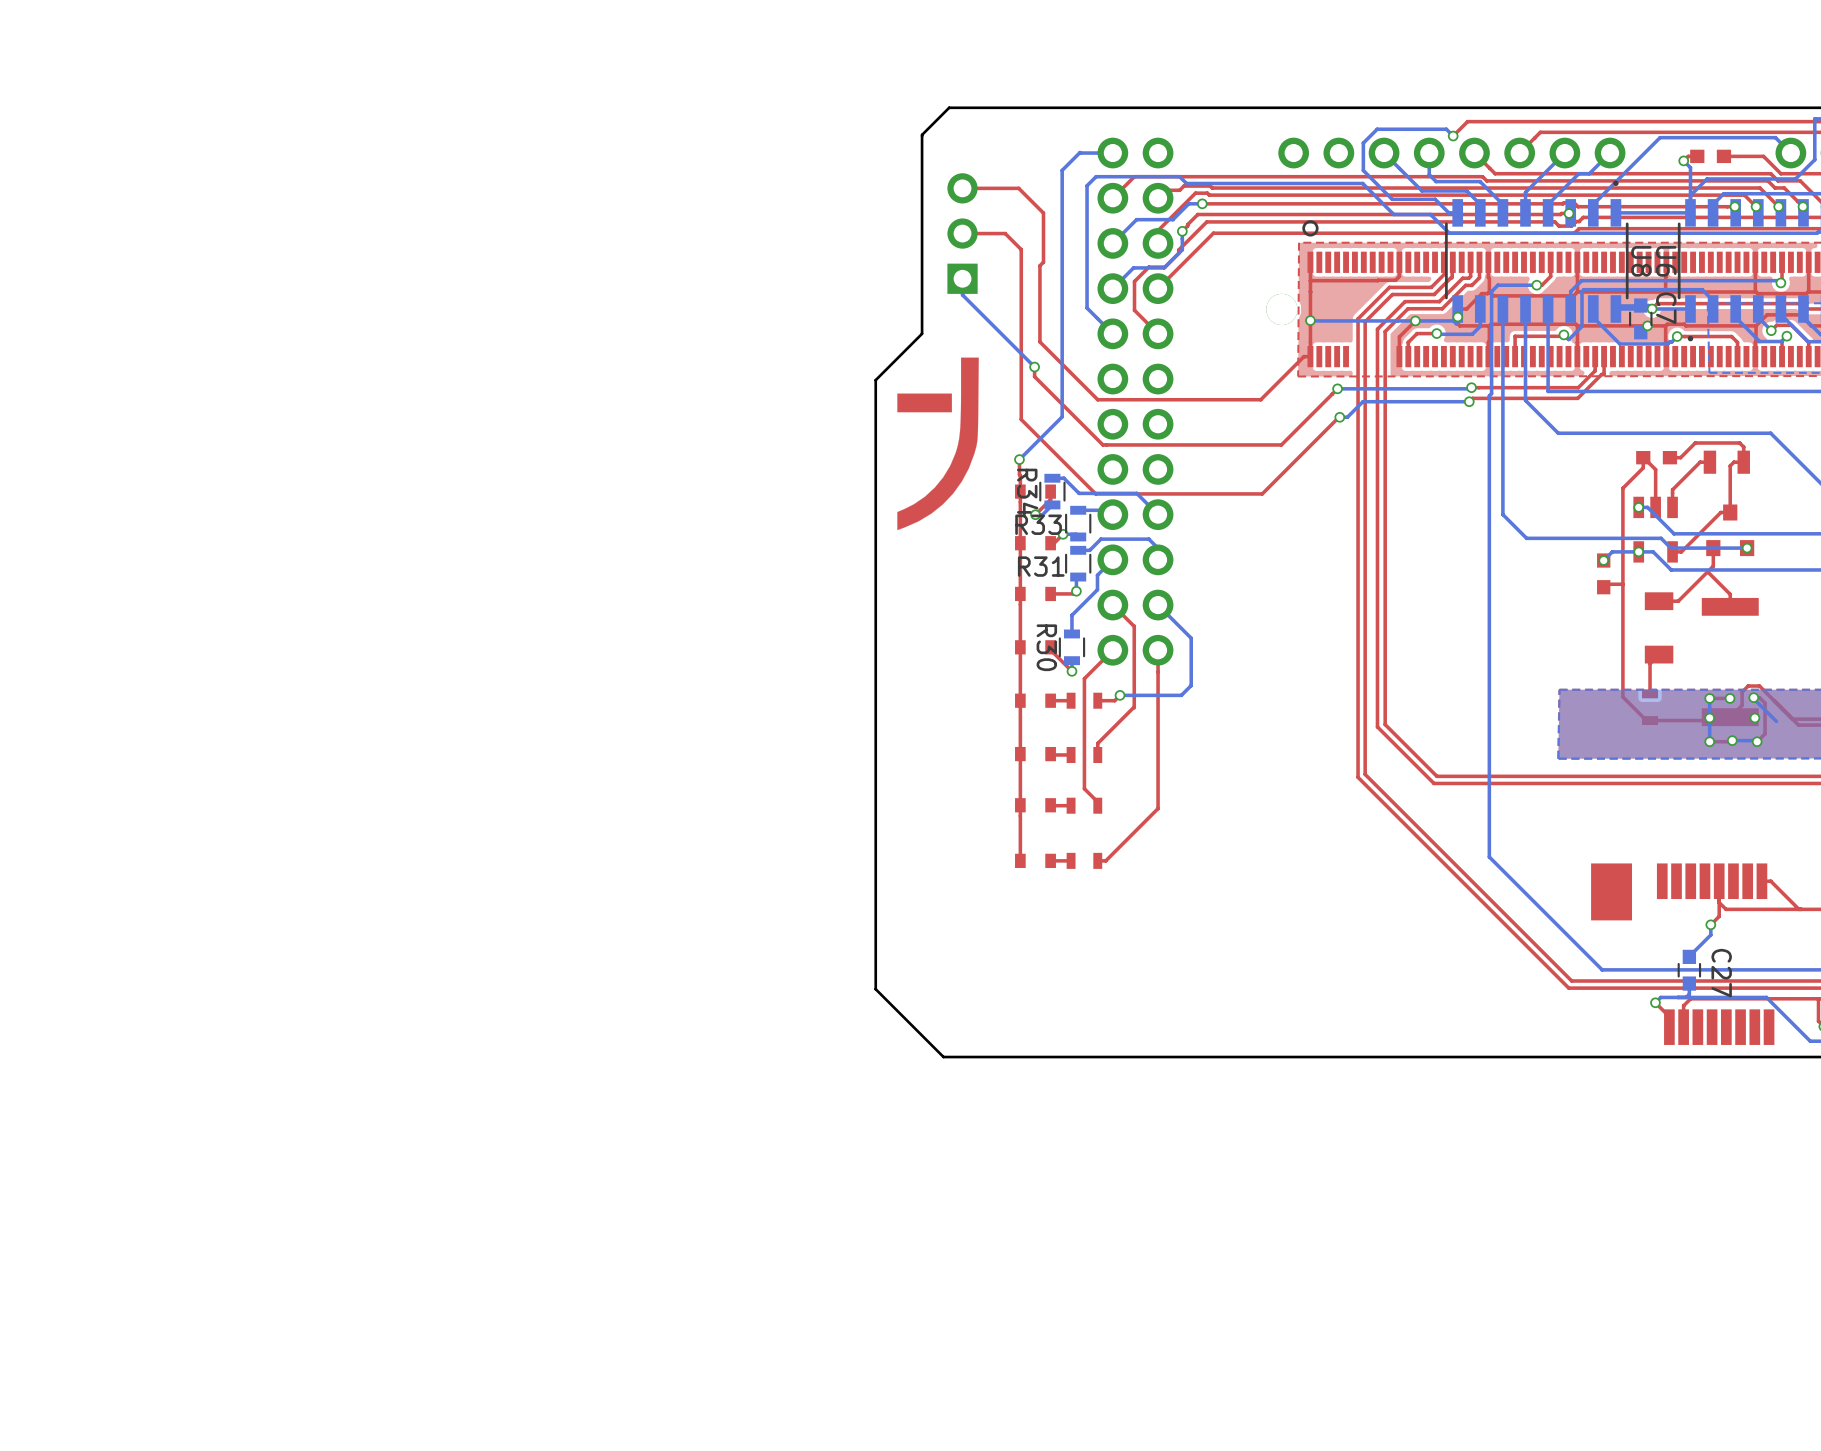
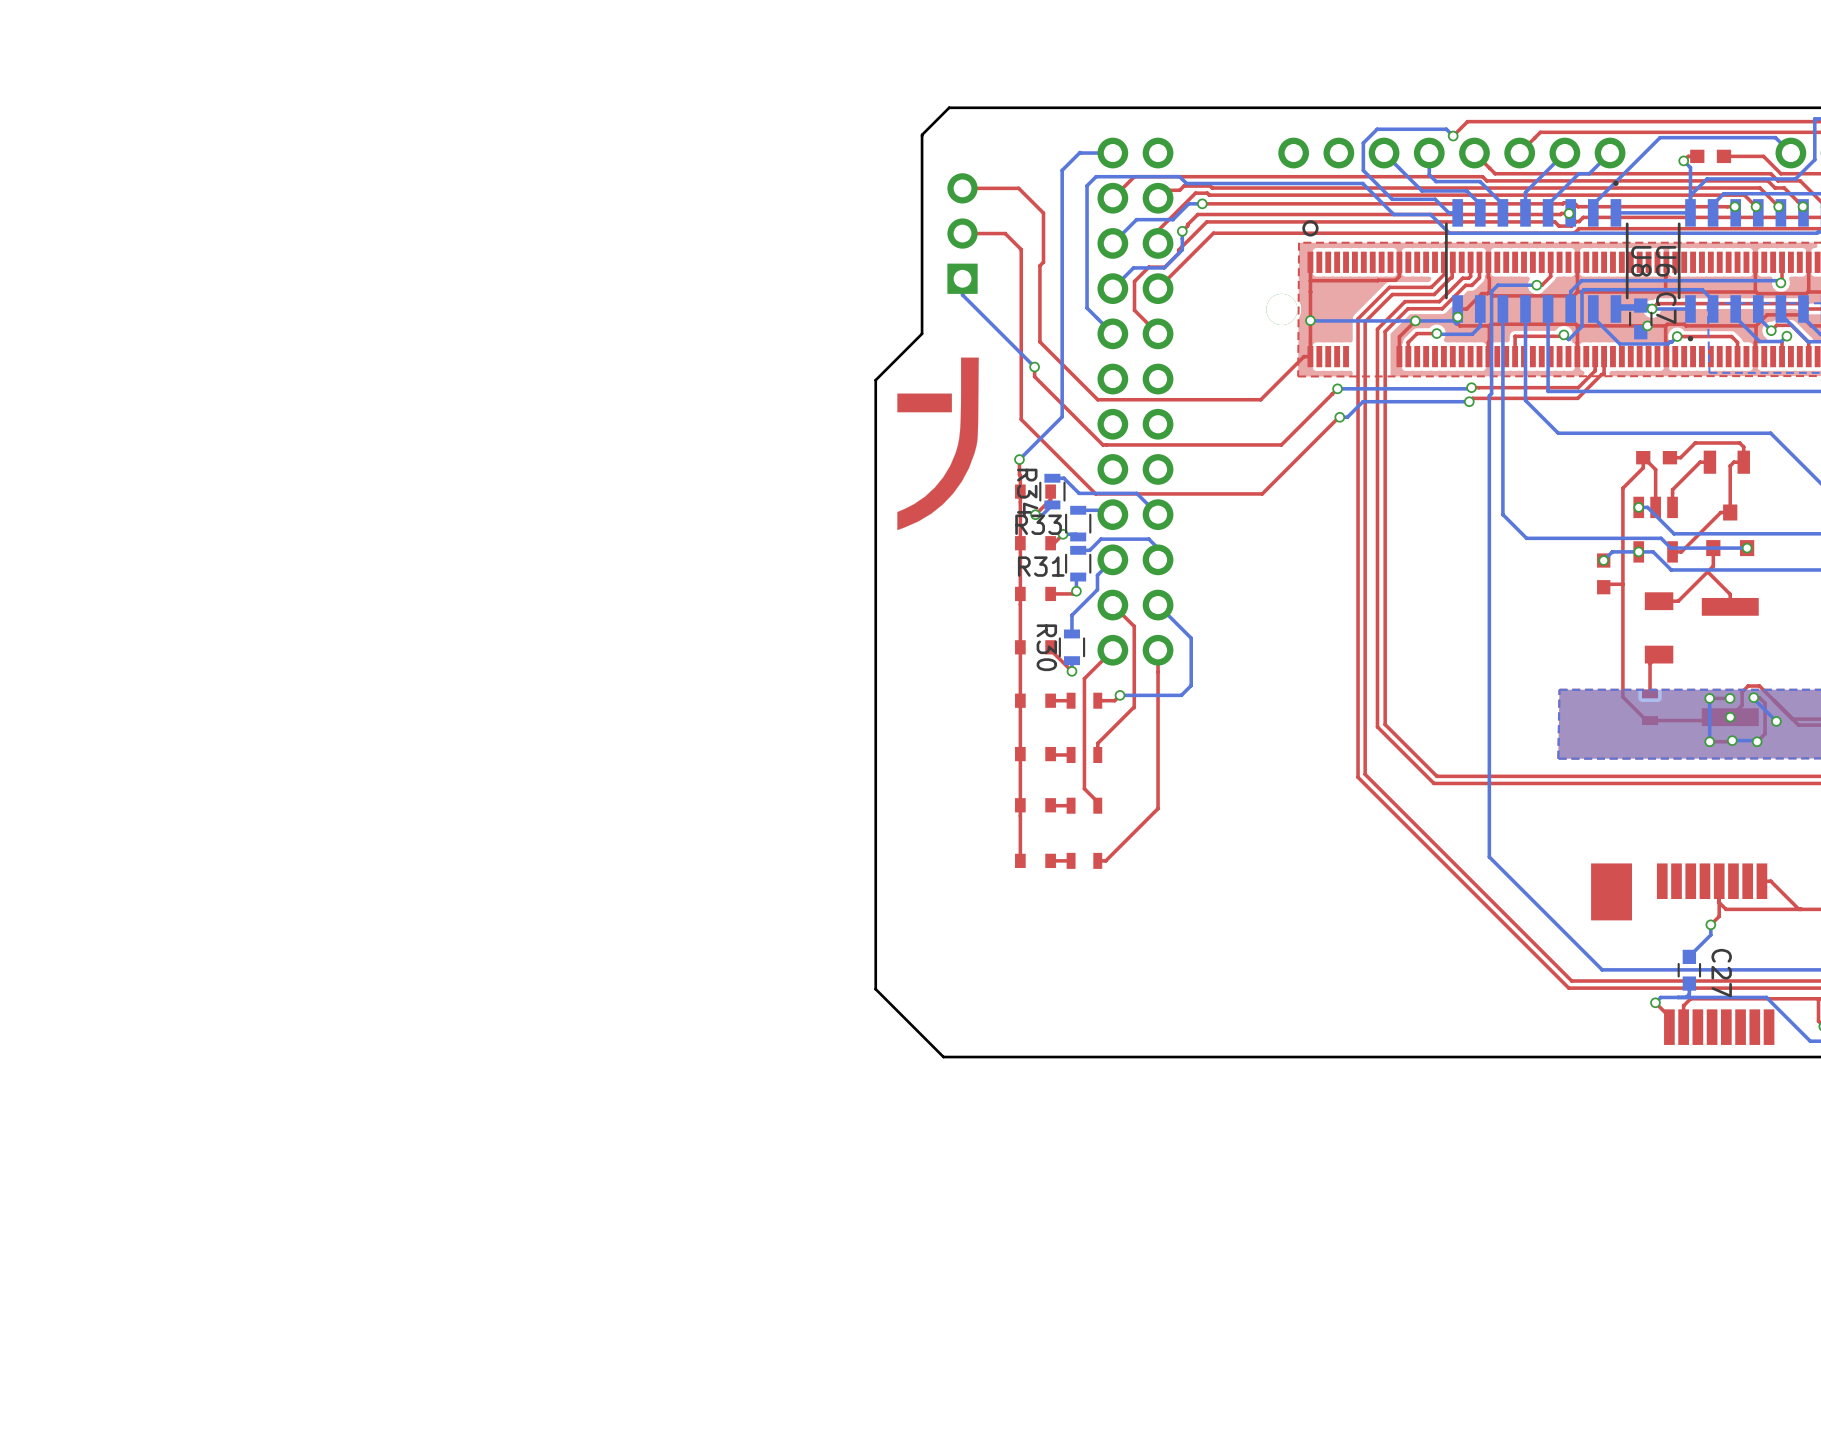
via: none -> (1730, 717)
via: (1709, 718) -> none
via: (1754, 718) -> none
via: none -> (1776, 721)

